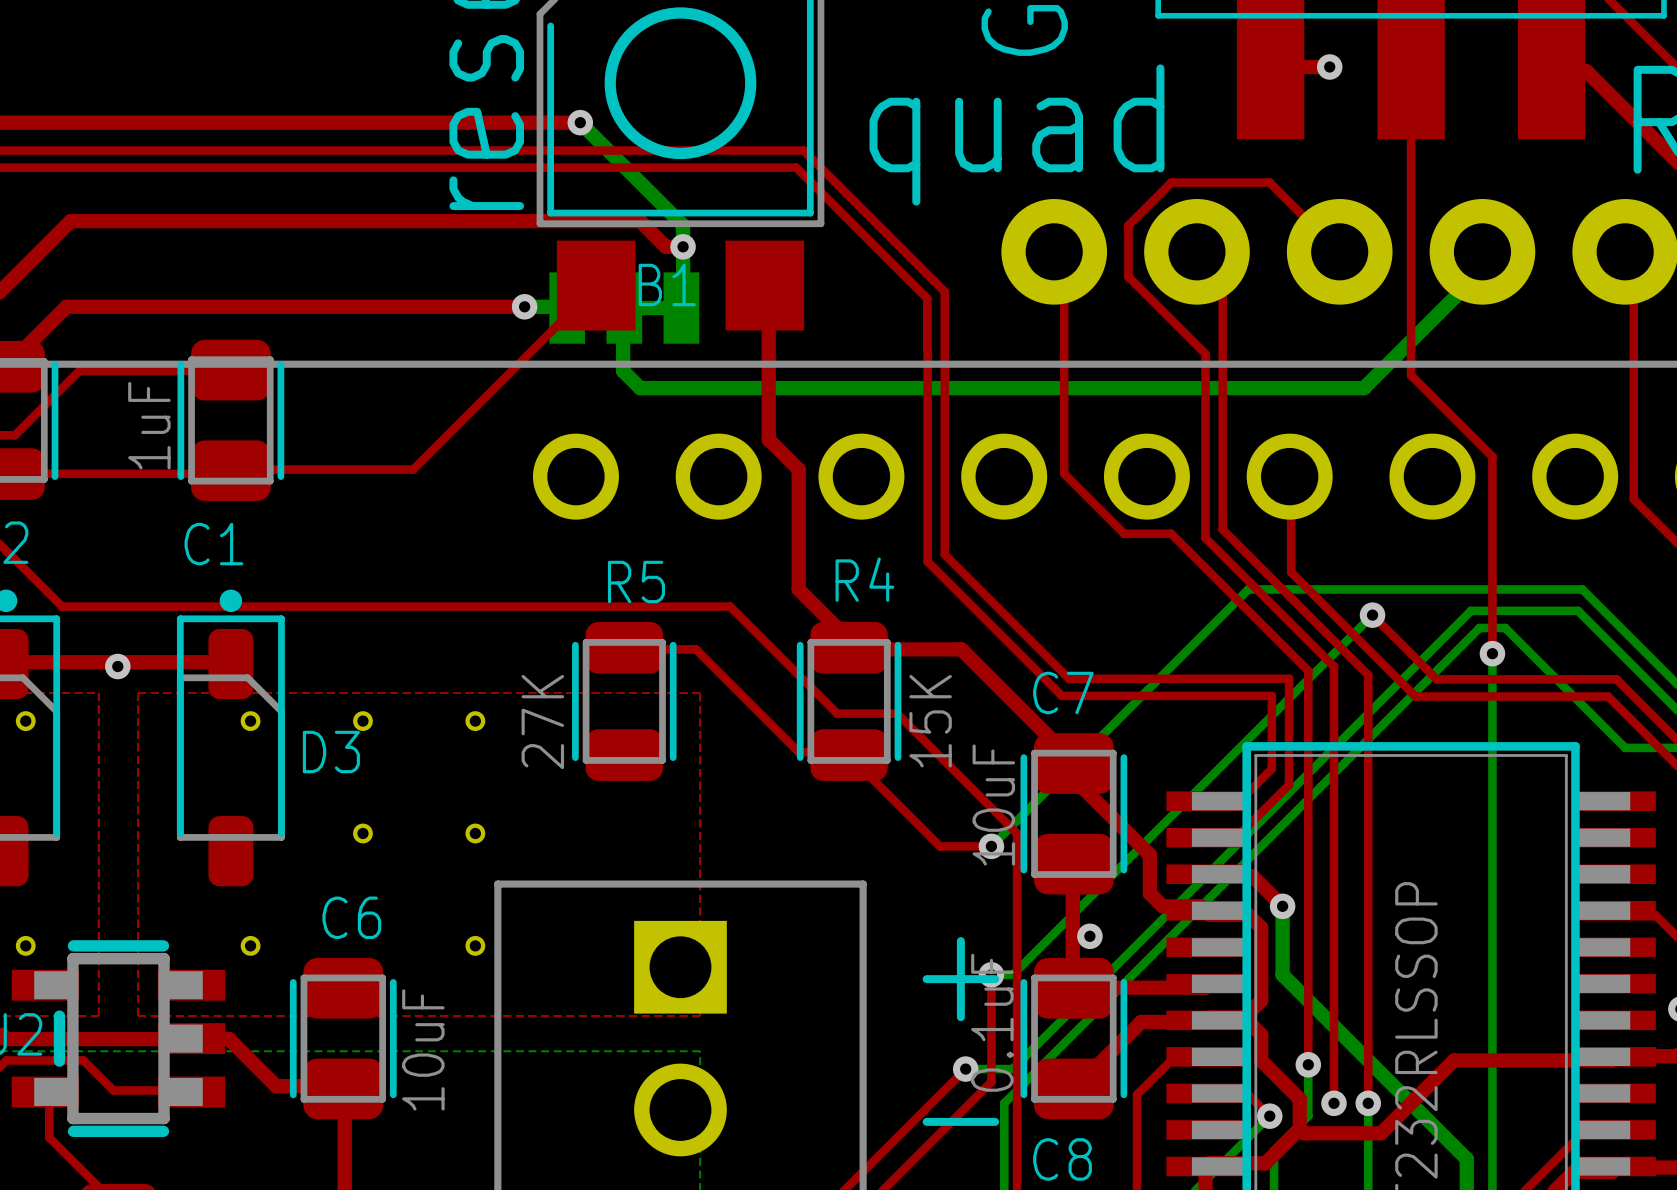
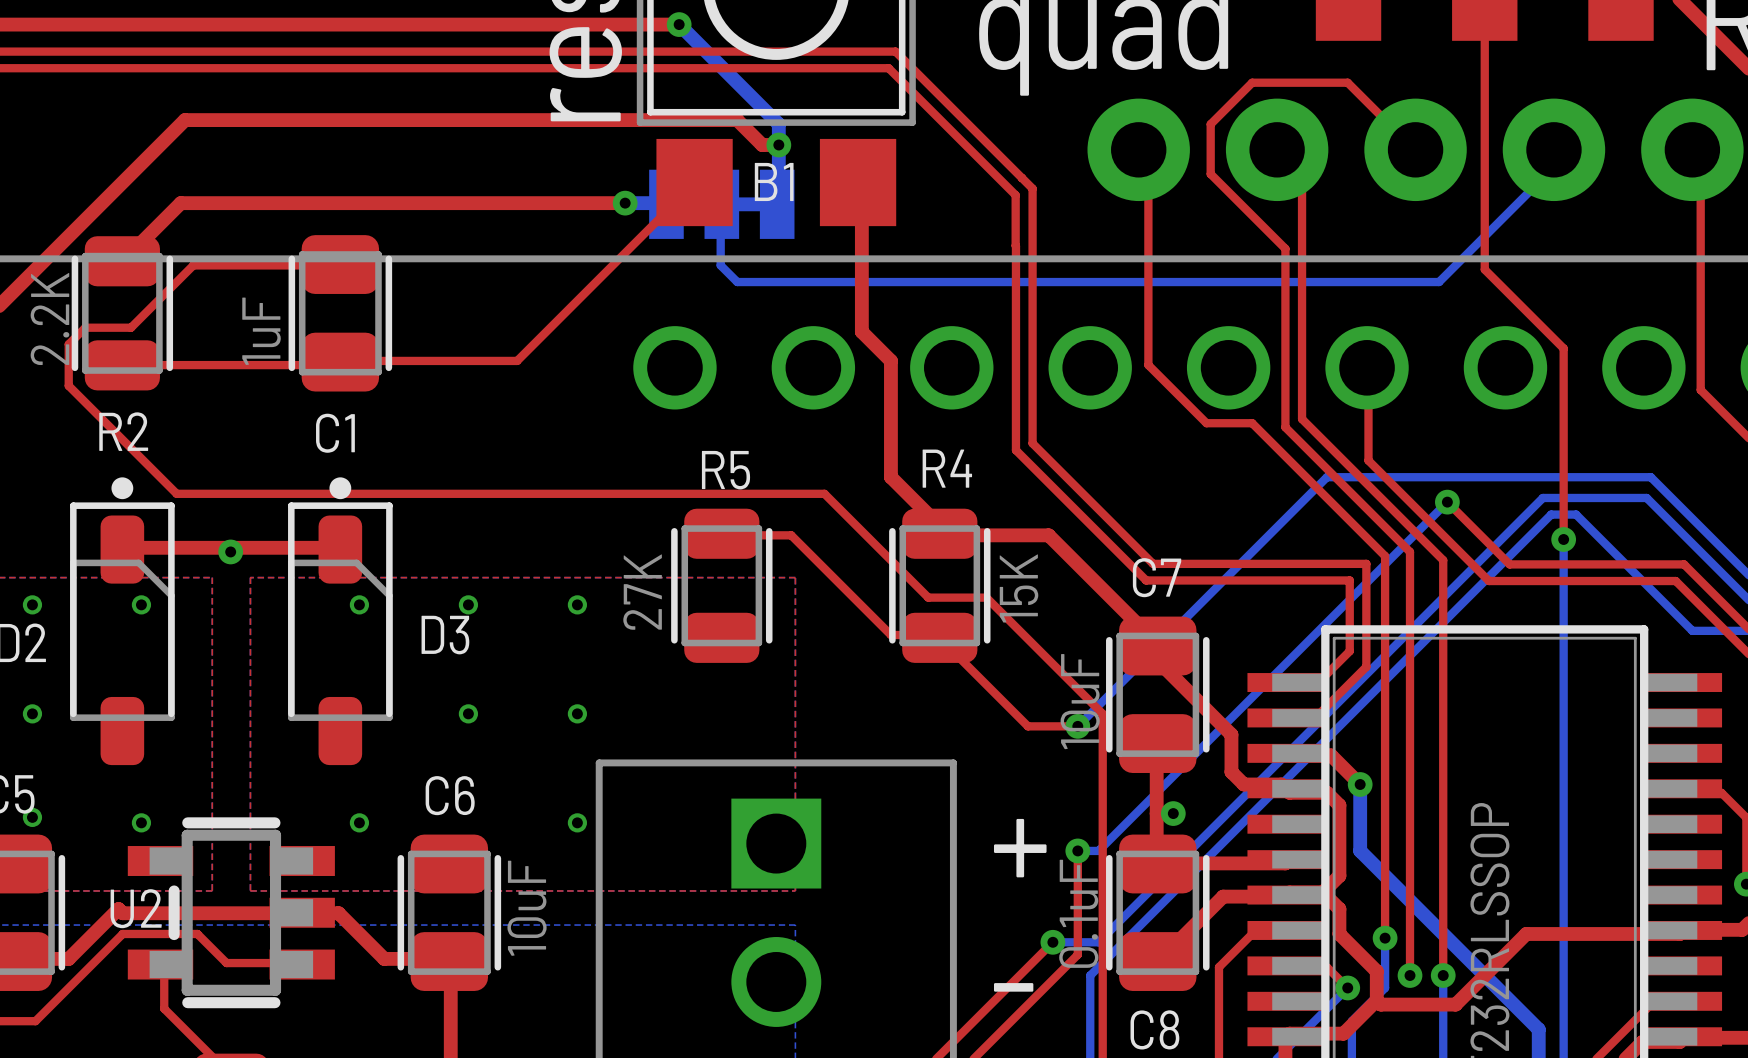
bottom track width: thick (1482, 251) (1479, 255) (1479, 272) (1363, 388) (640, 388) (623, 371) (624, 308) -> thin (1553, 149) (1551, 153) (1551, 169) (1439, 282) (737, 282) (720, 265) (721, 204)

